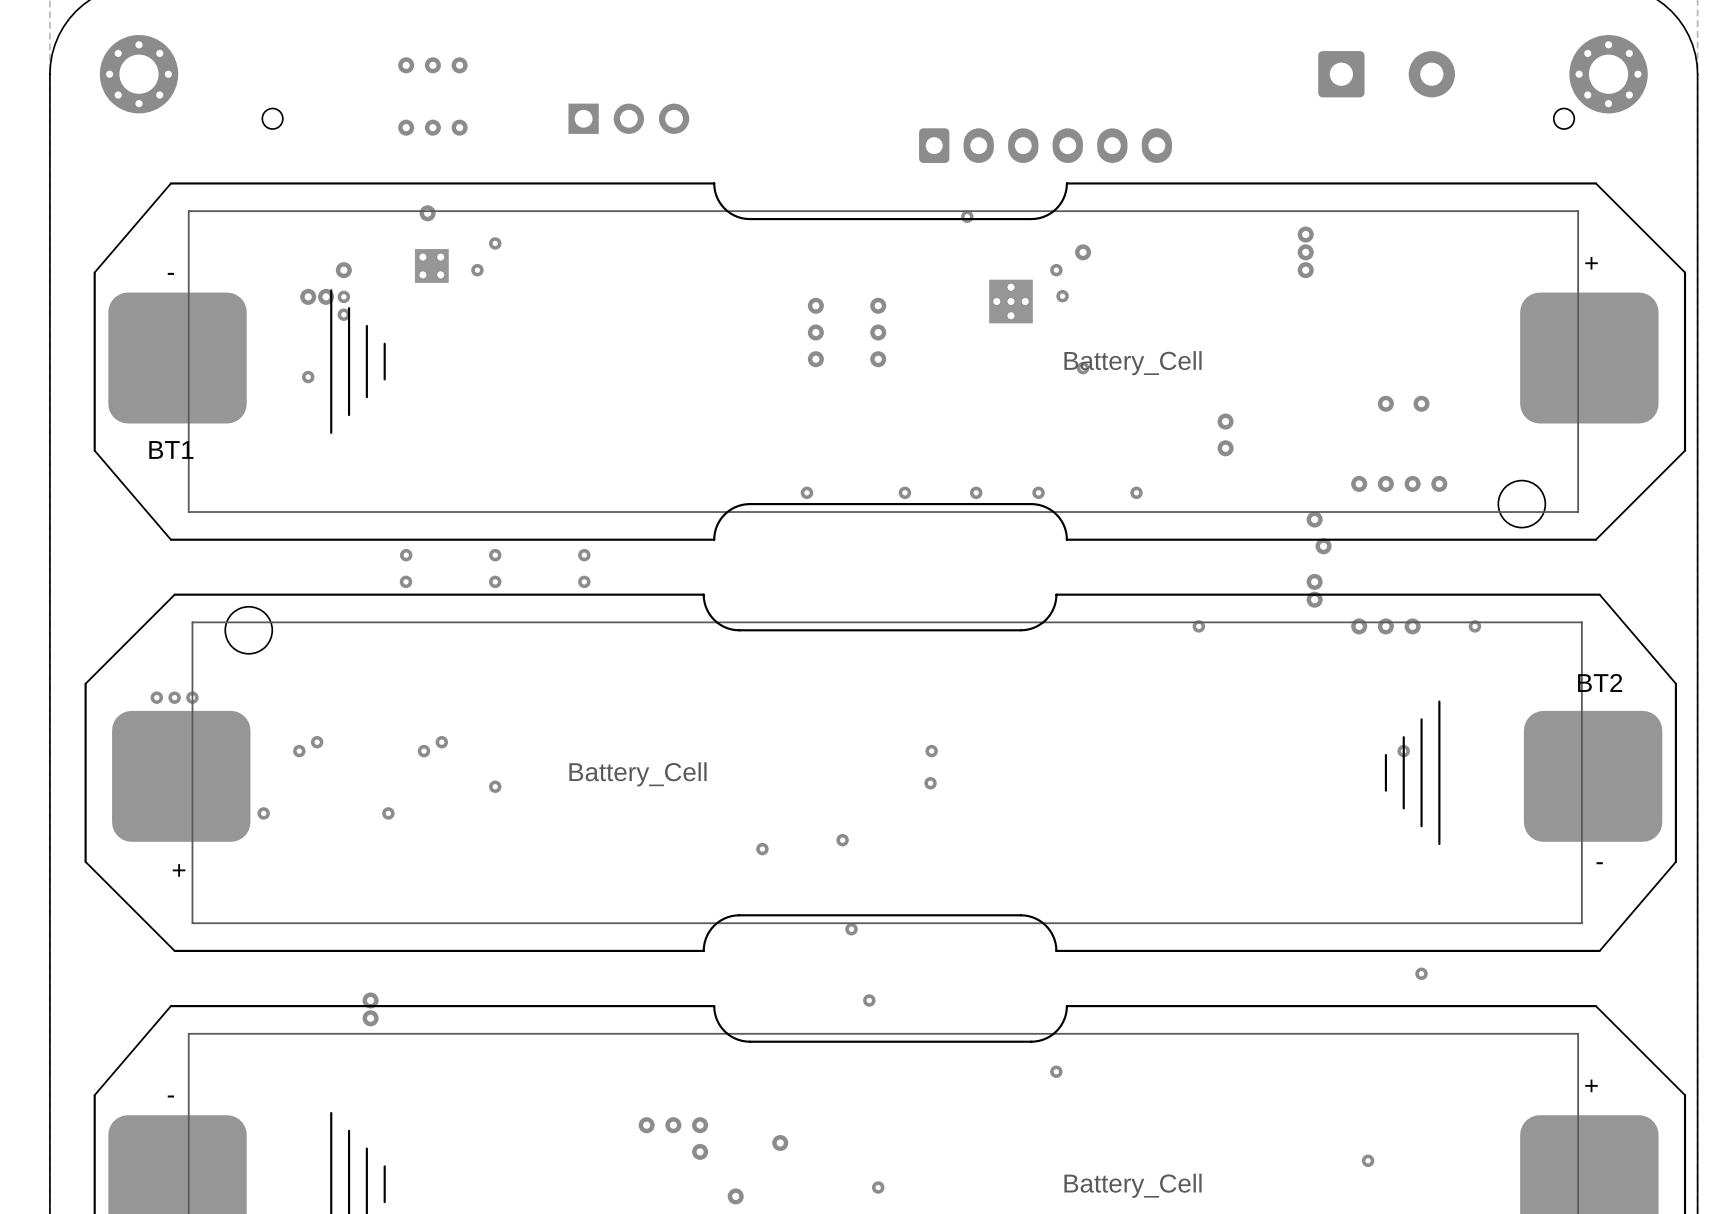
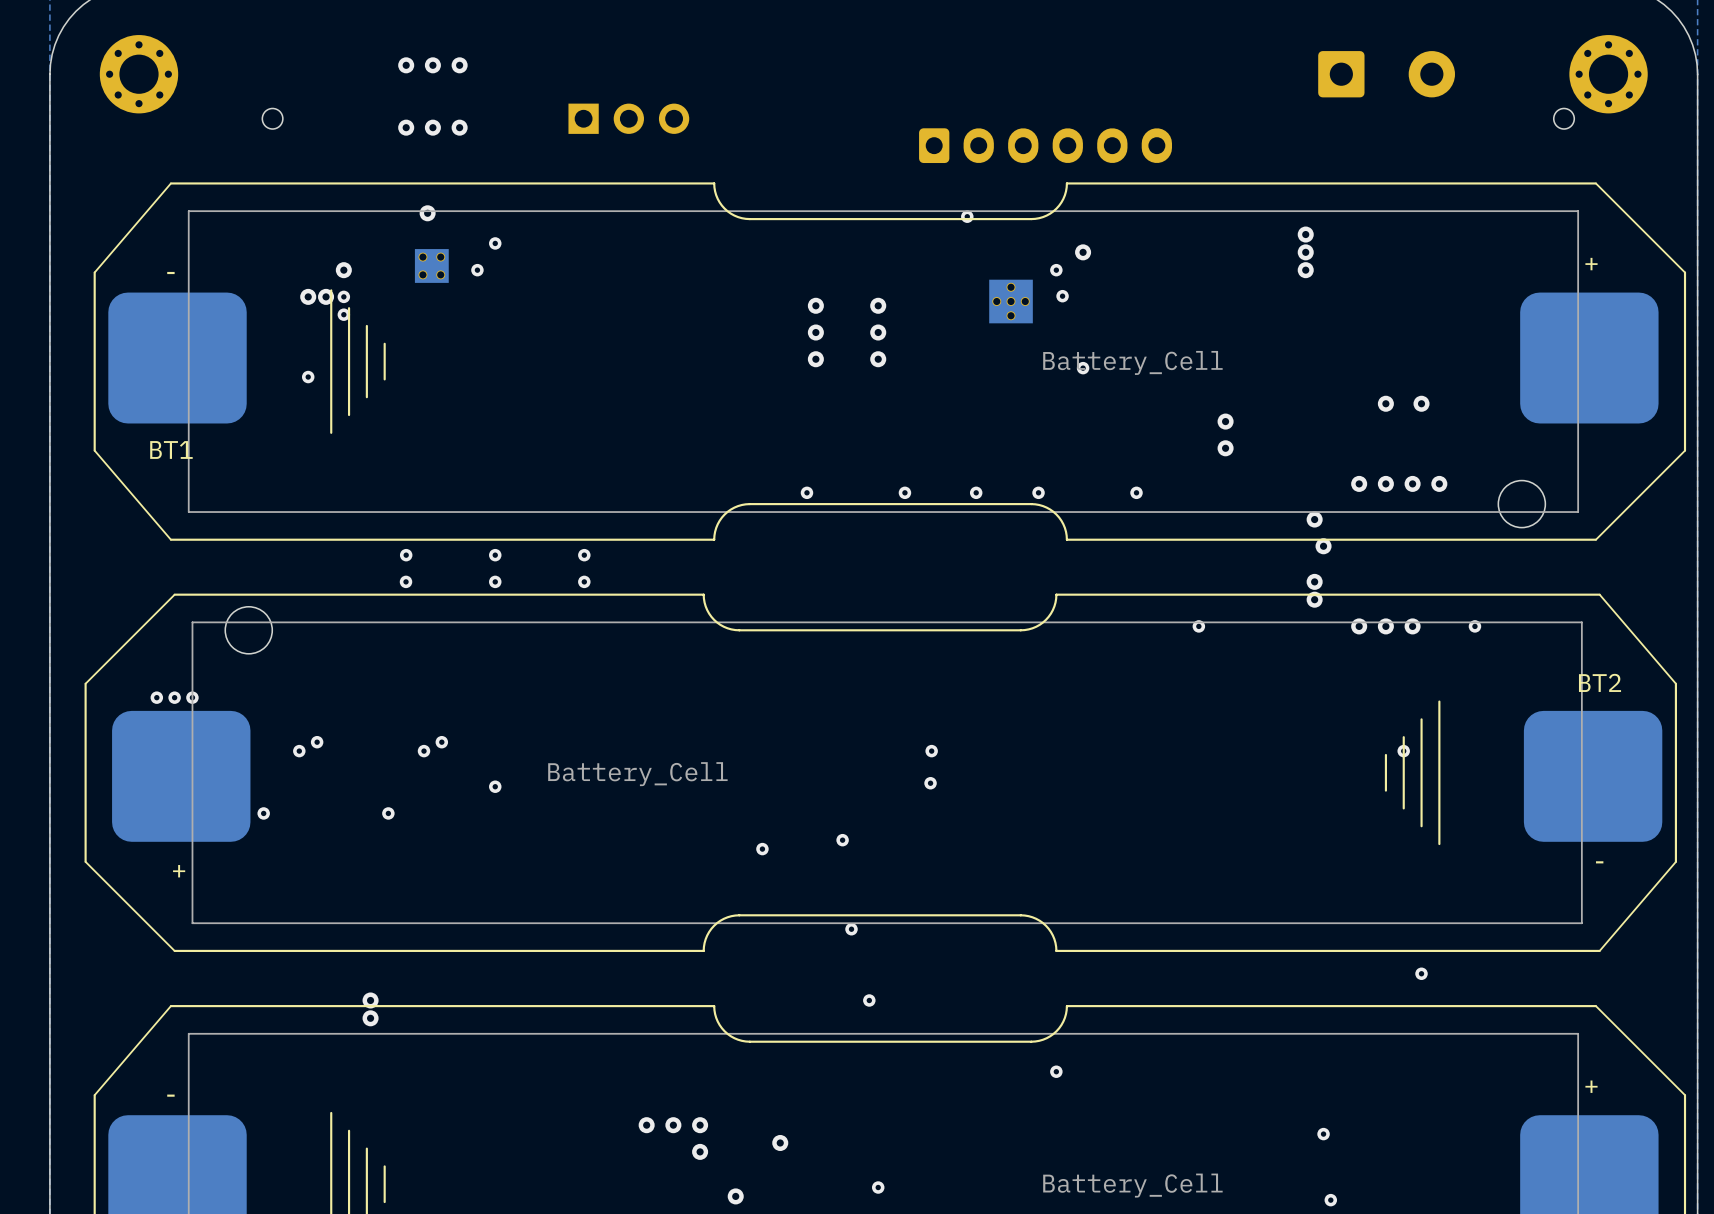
via: none -> (1323, 1134)
via: (1368, 1160) -> none
via: none -> (1330, 1200)

